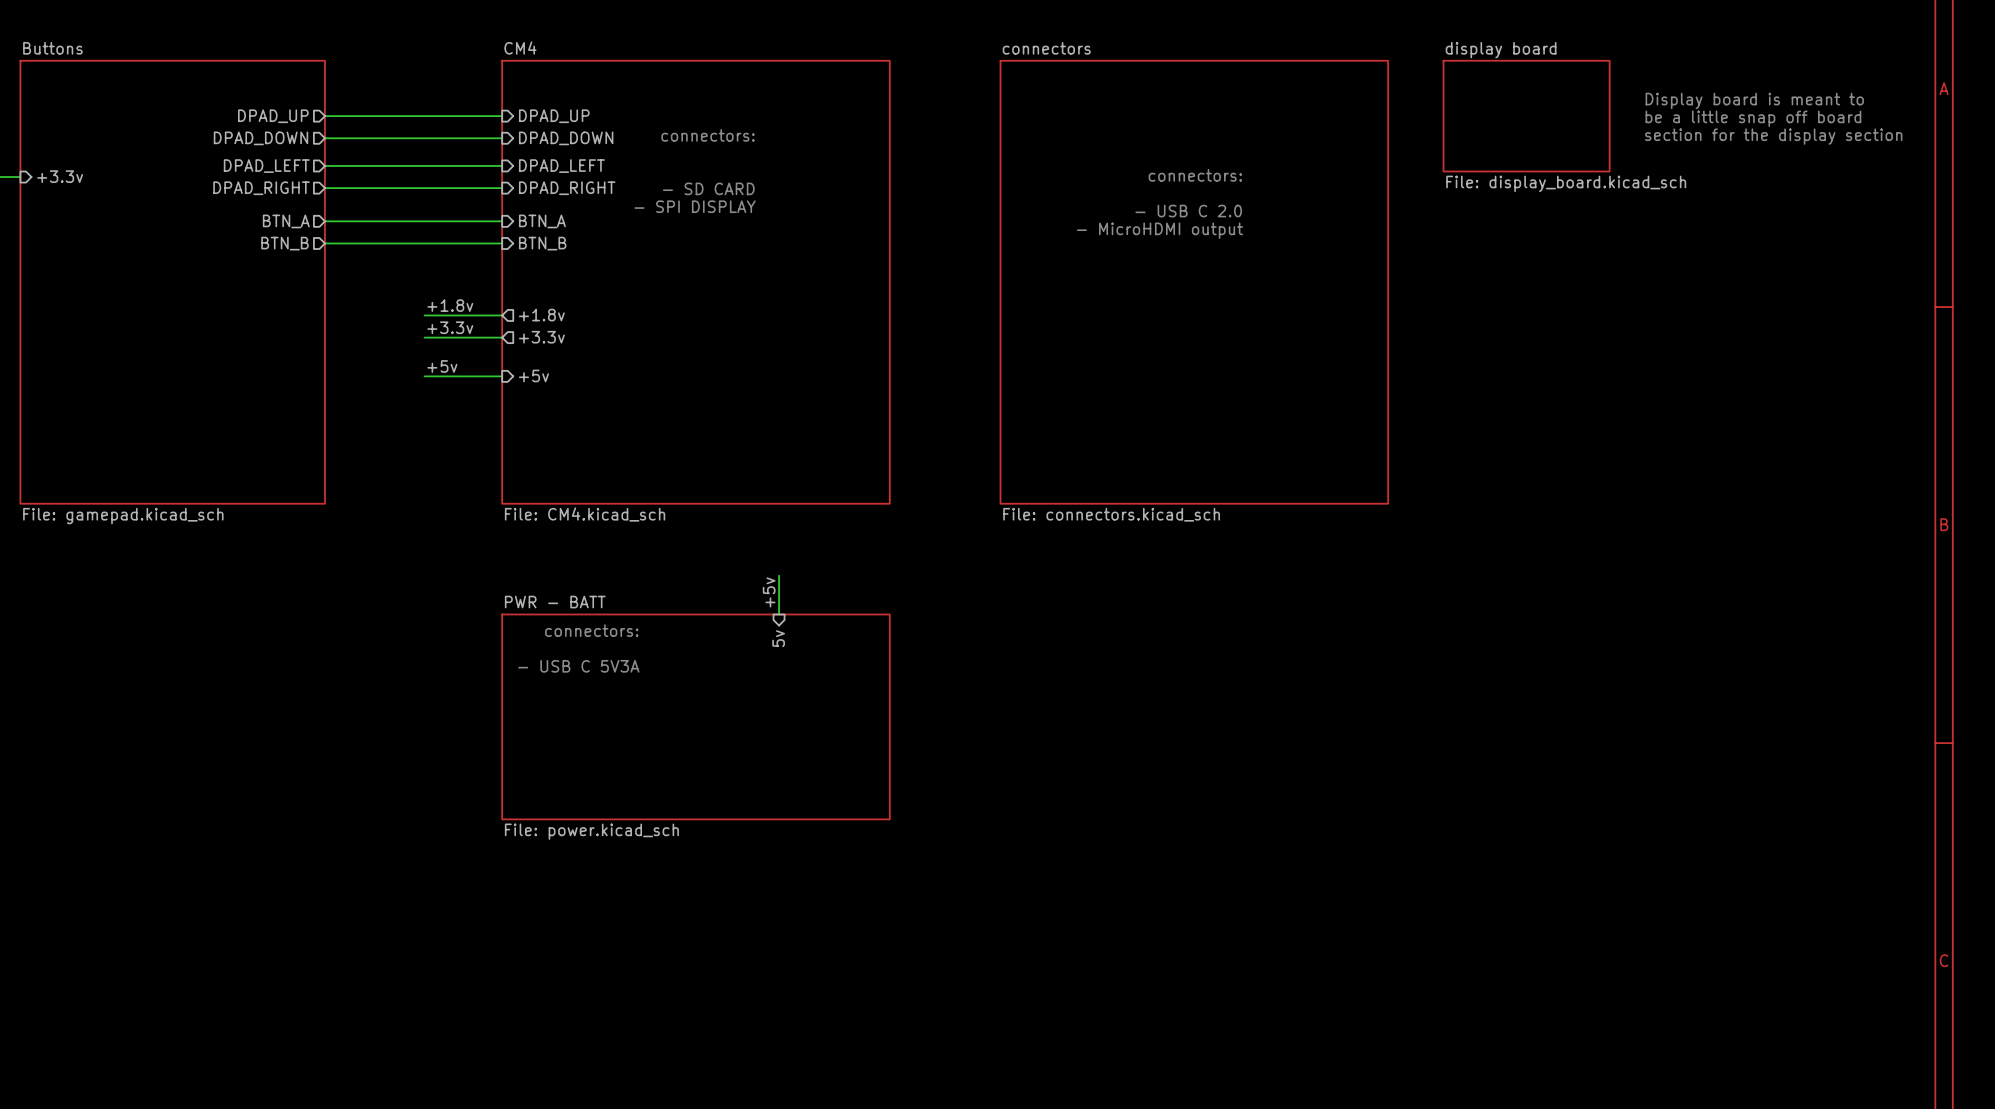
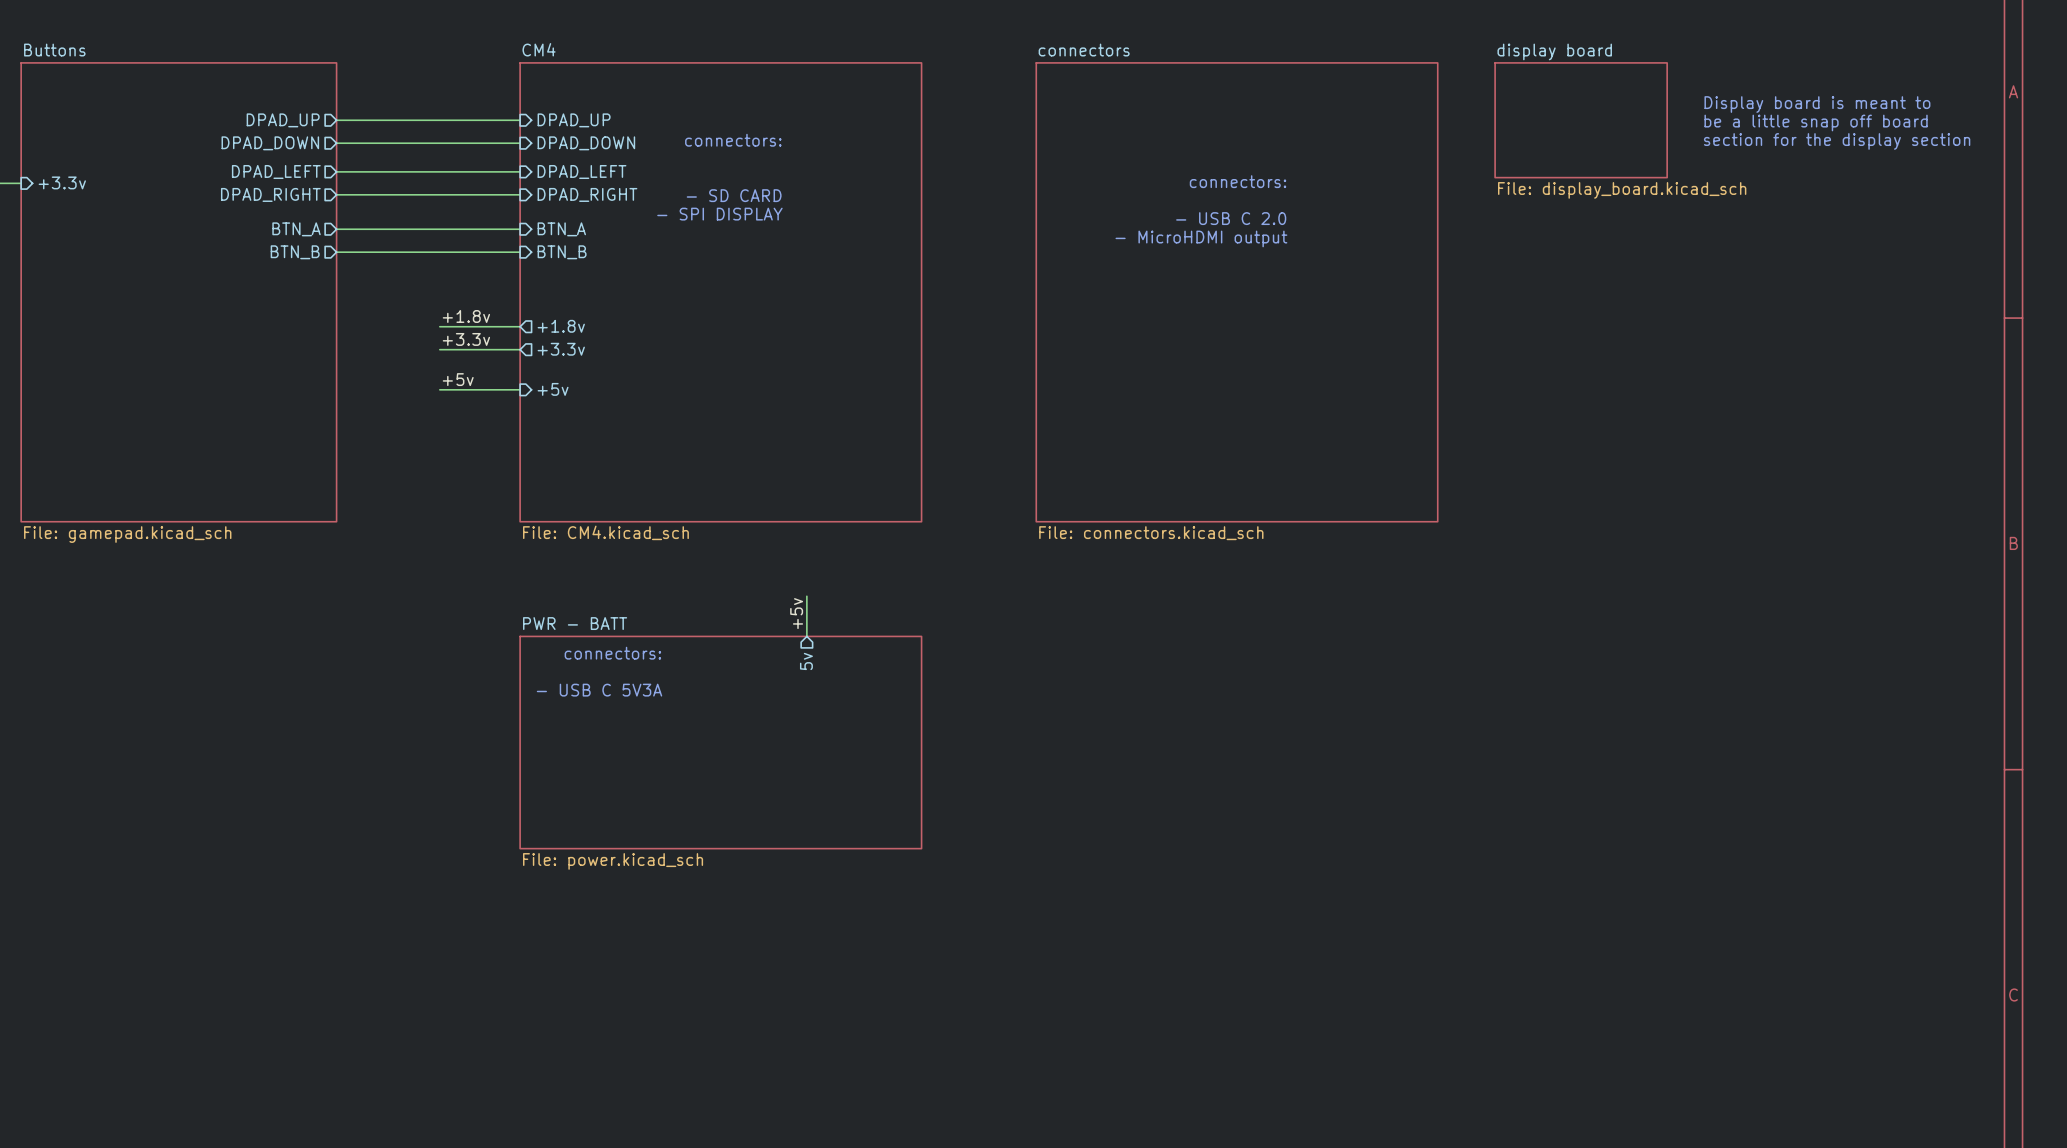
sheet pin shape: input (778, 638) -> output (806, 661)

